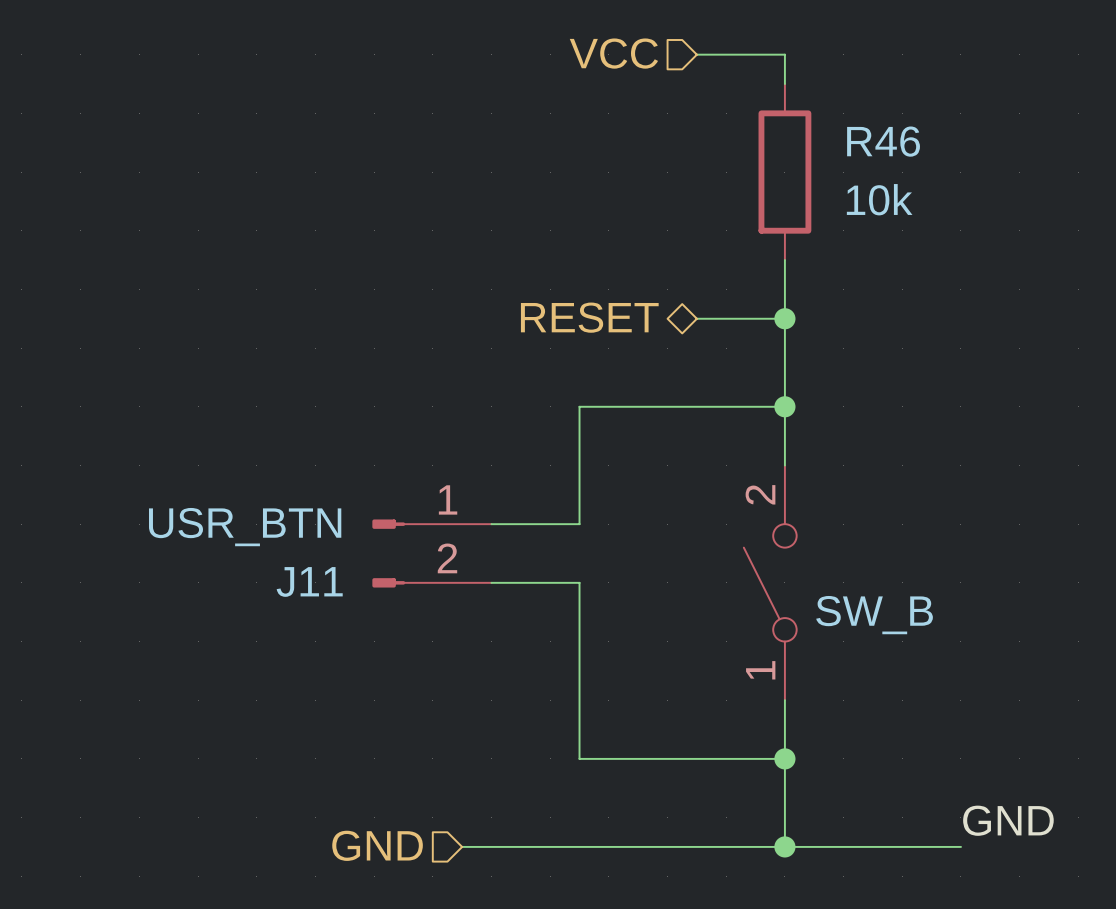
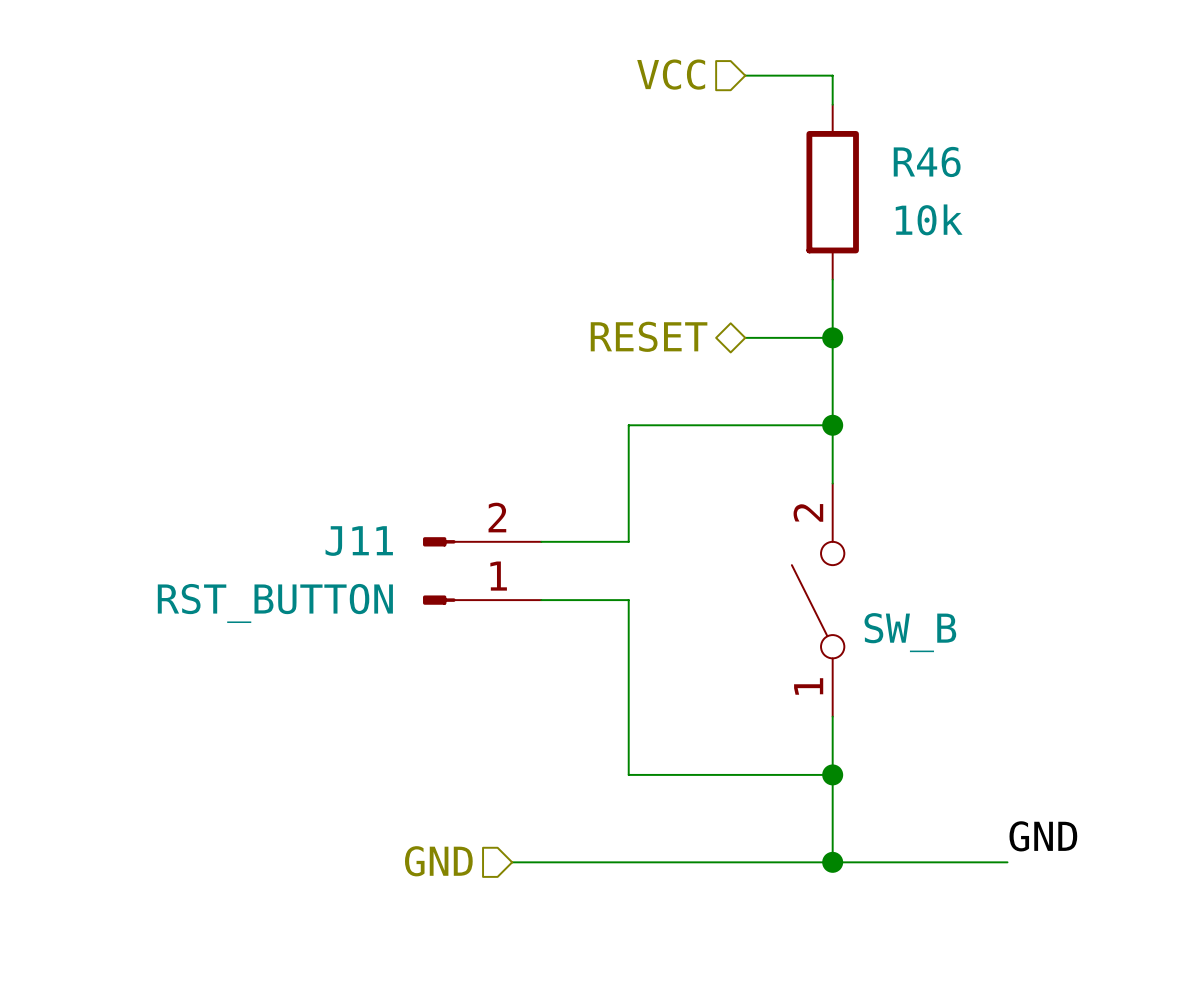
J11 value: USR_BTN (245, 527) -> RST_BUTTON (275, 603)
J11 flip: as is (388, 553) -> up-down (439, 570)

